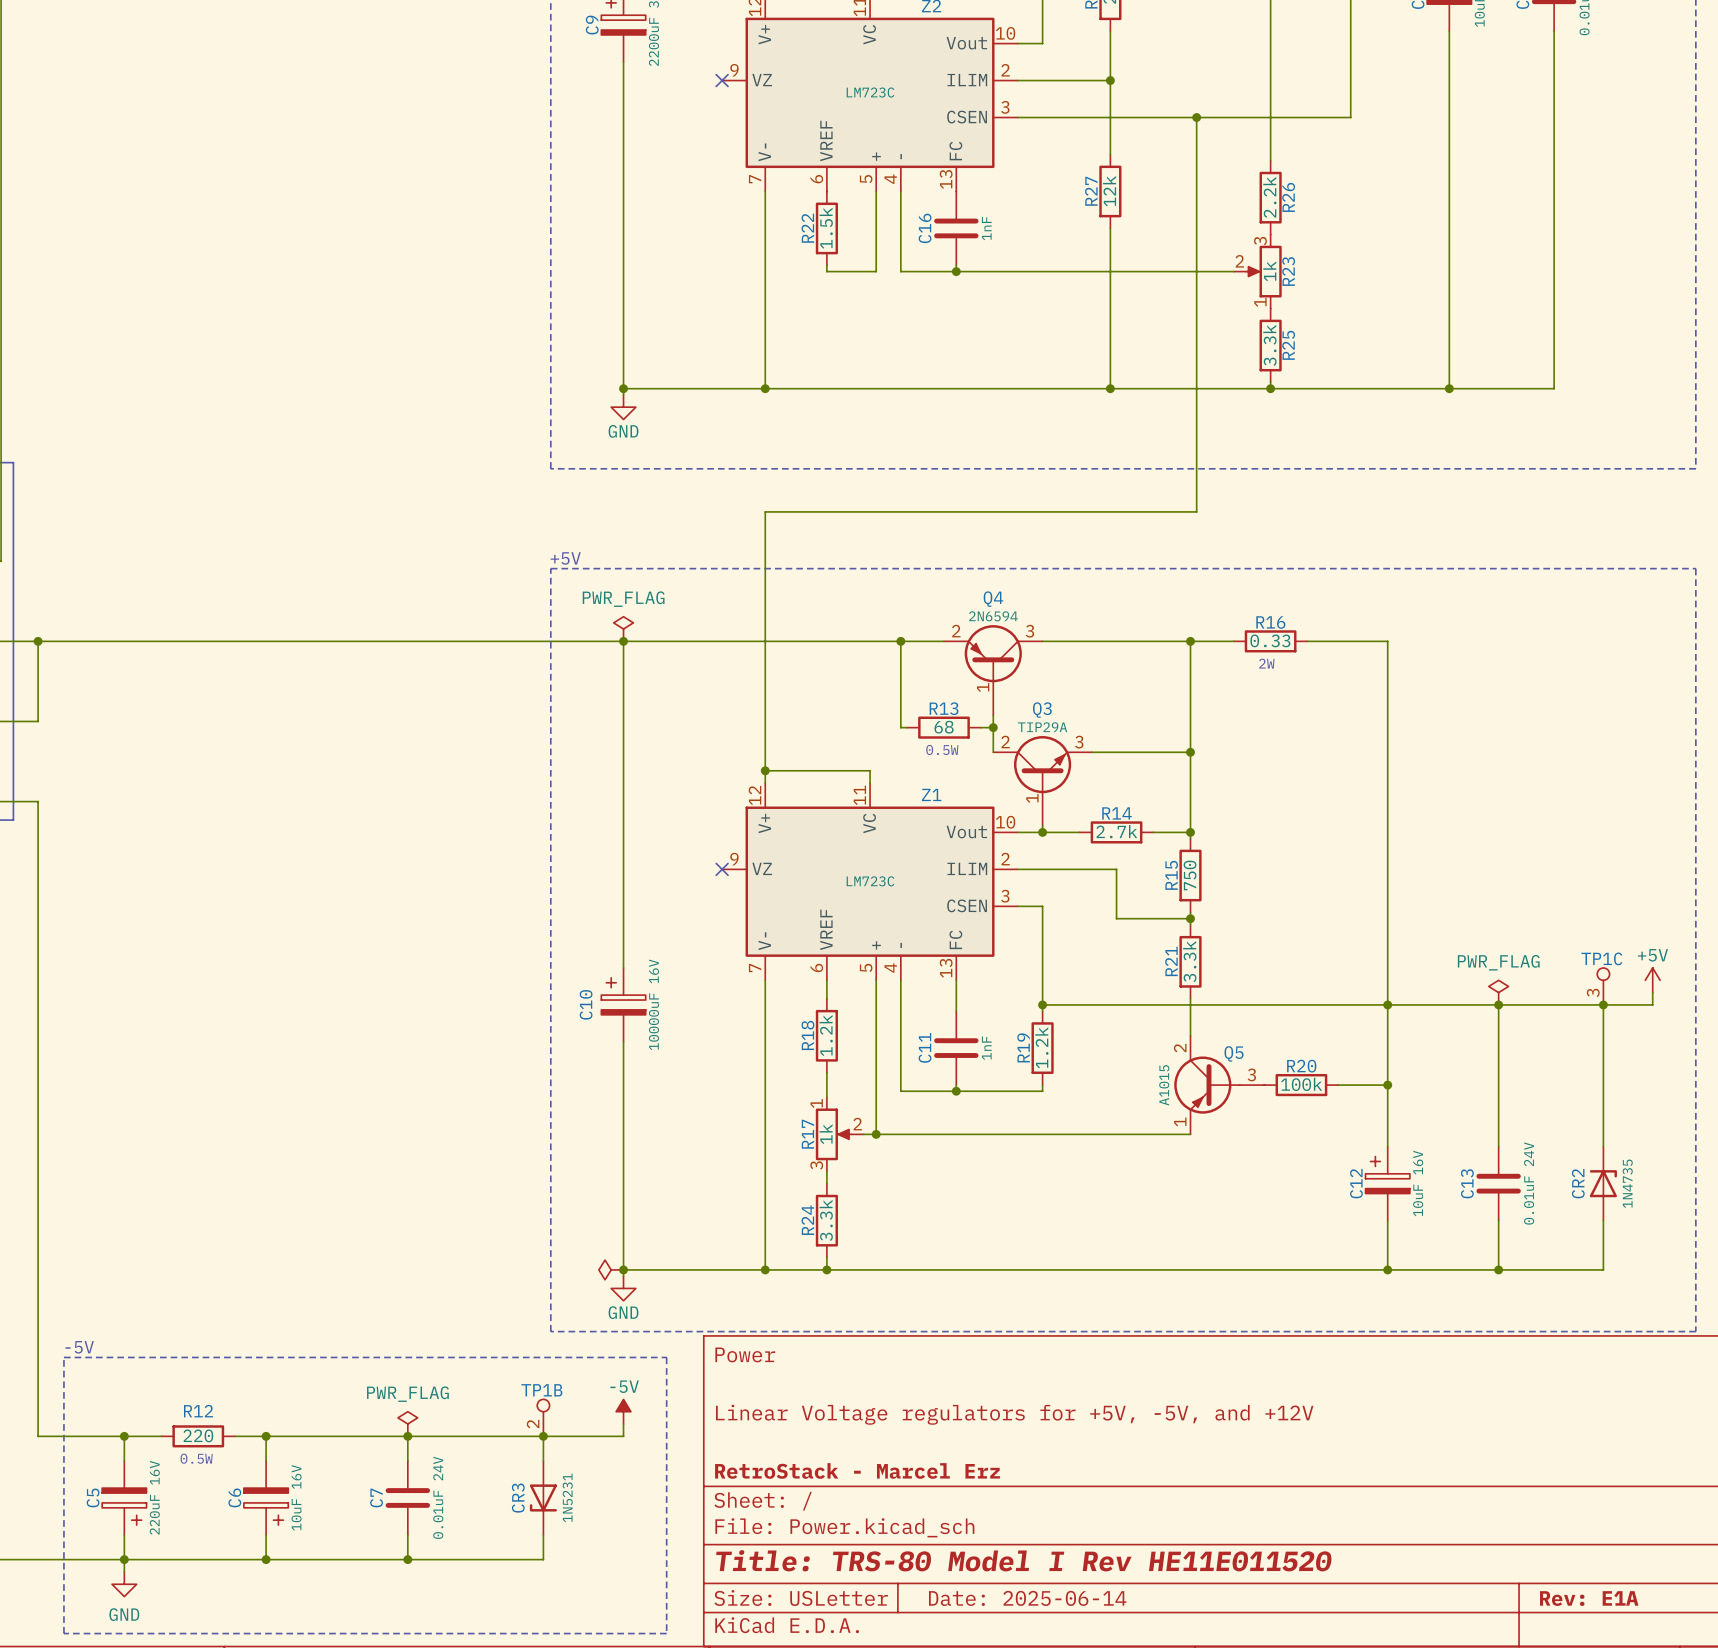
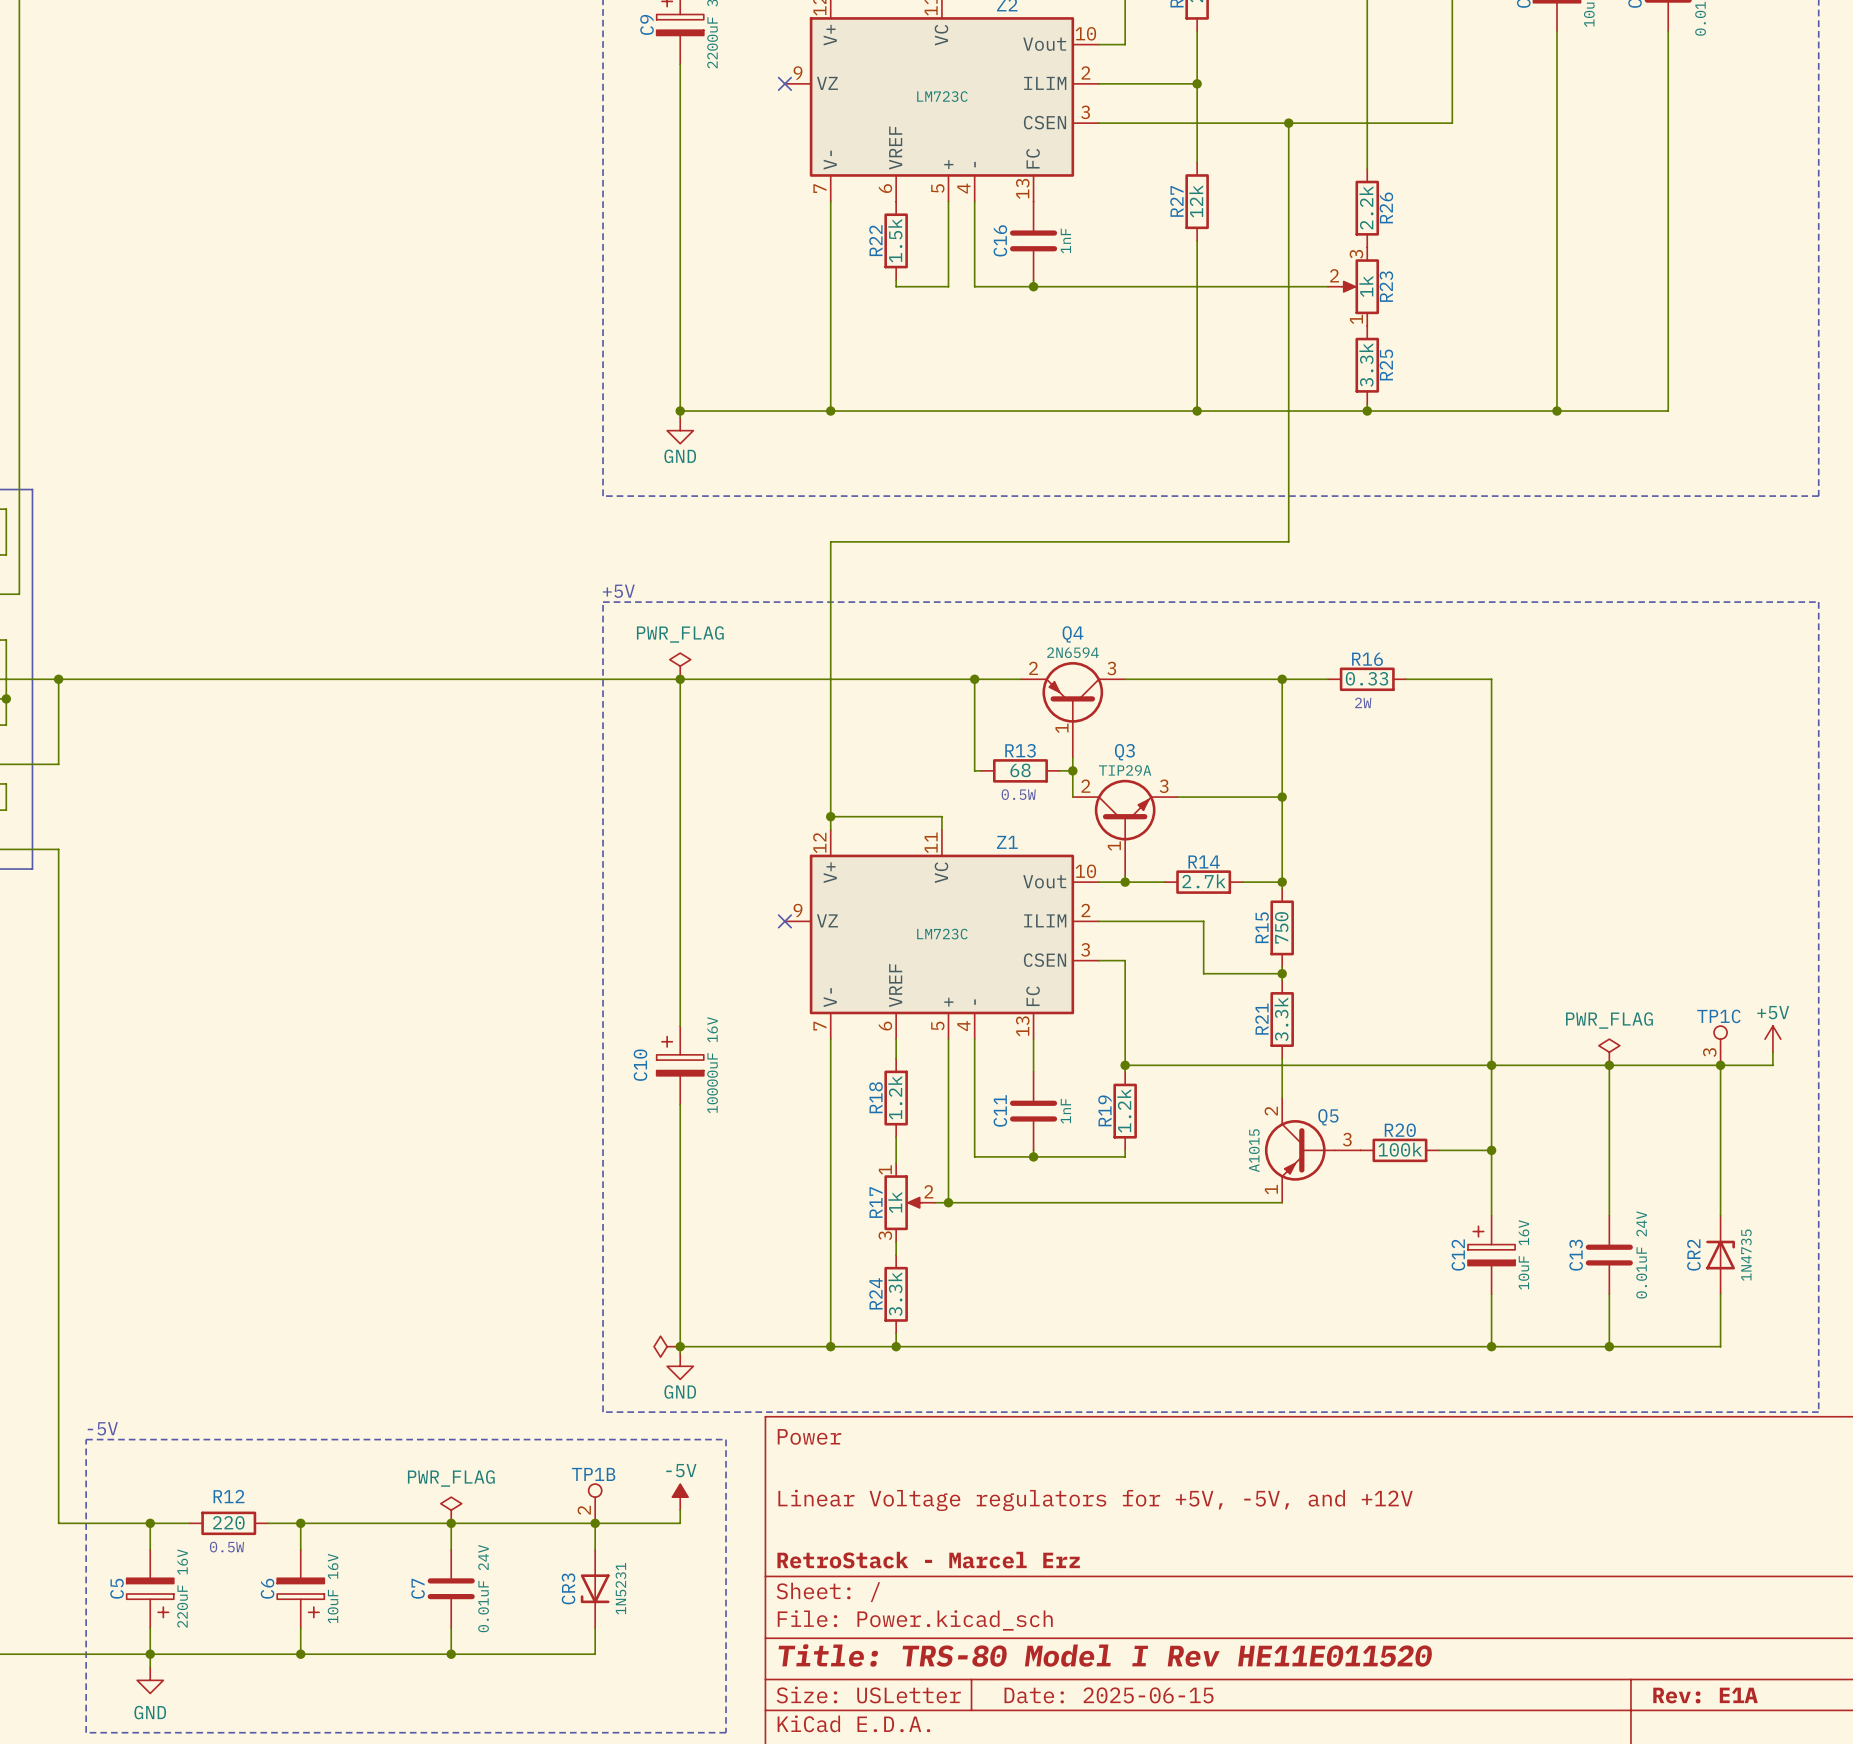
title block: Date: 2025-06-14 (1027, 1598) -> Date: 2025-06-15 (1109, 1695)

